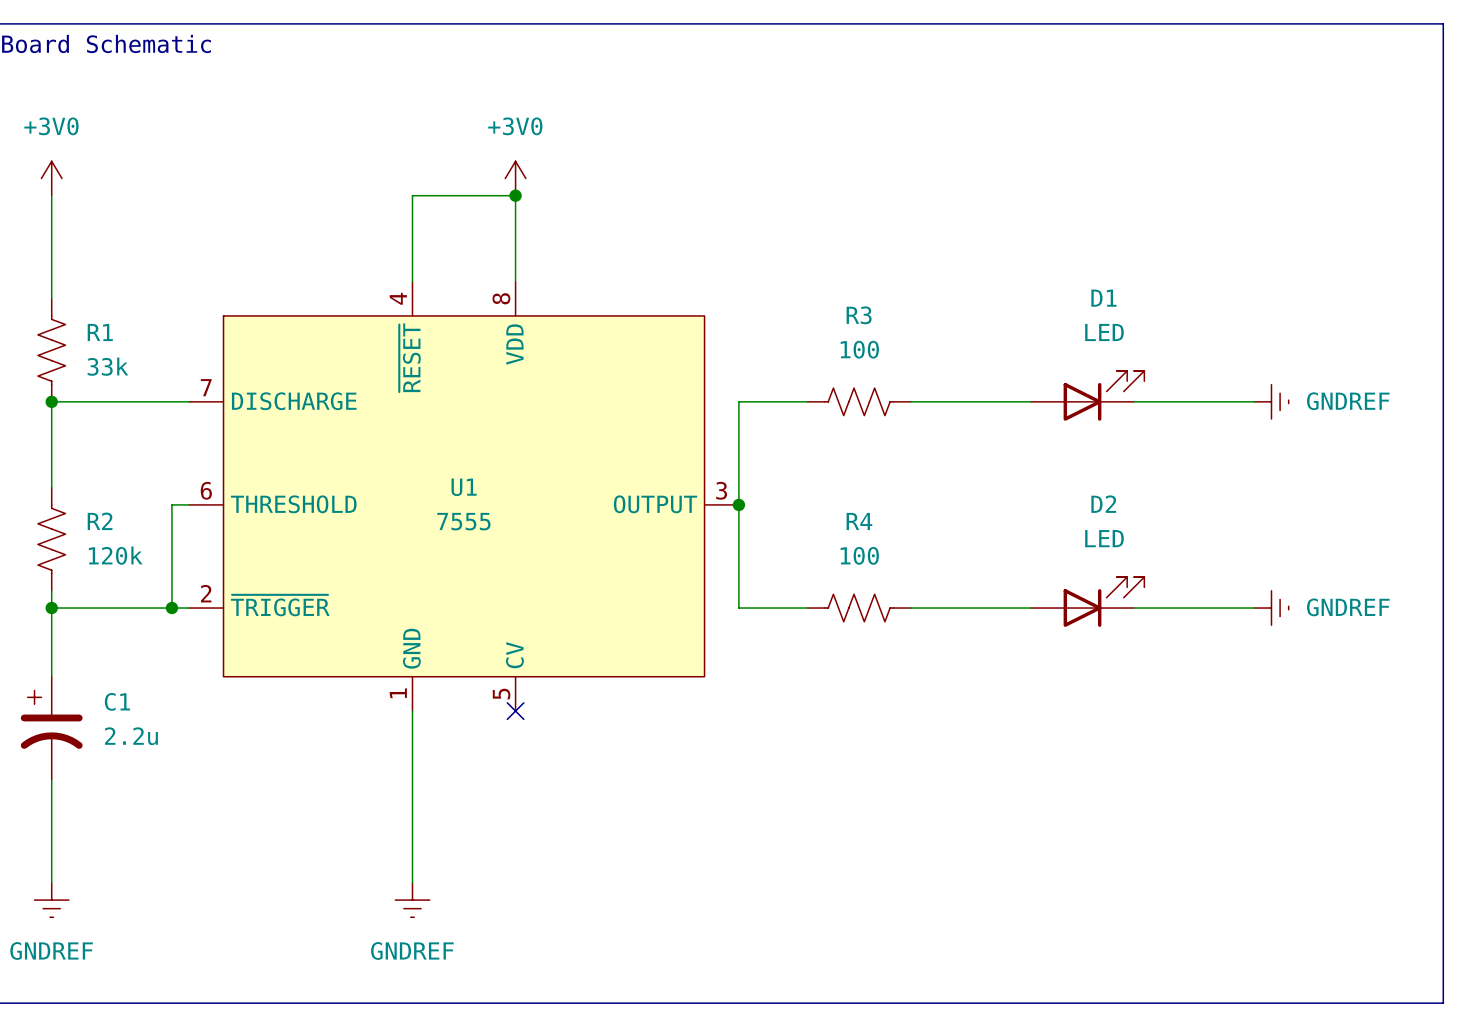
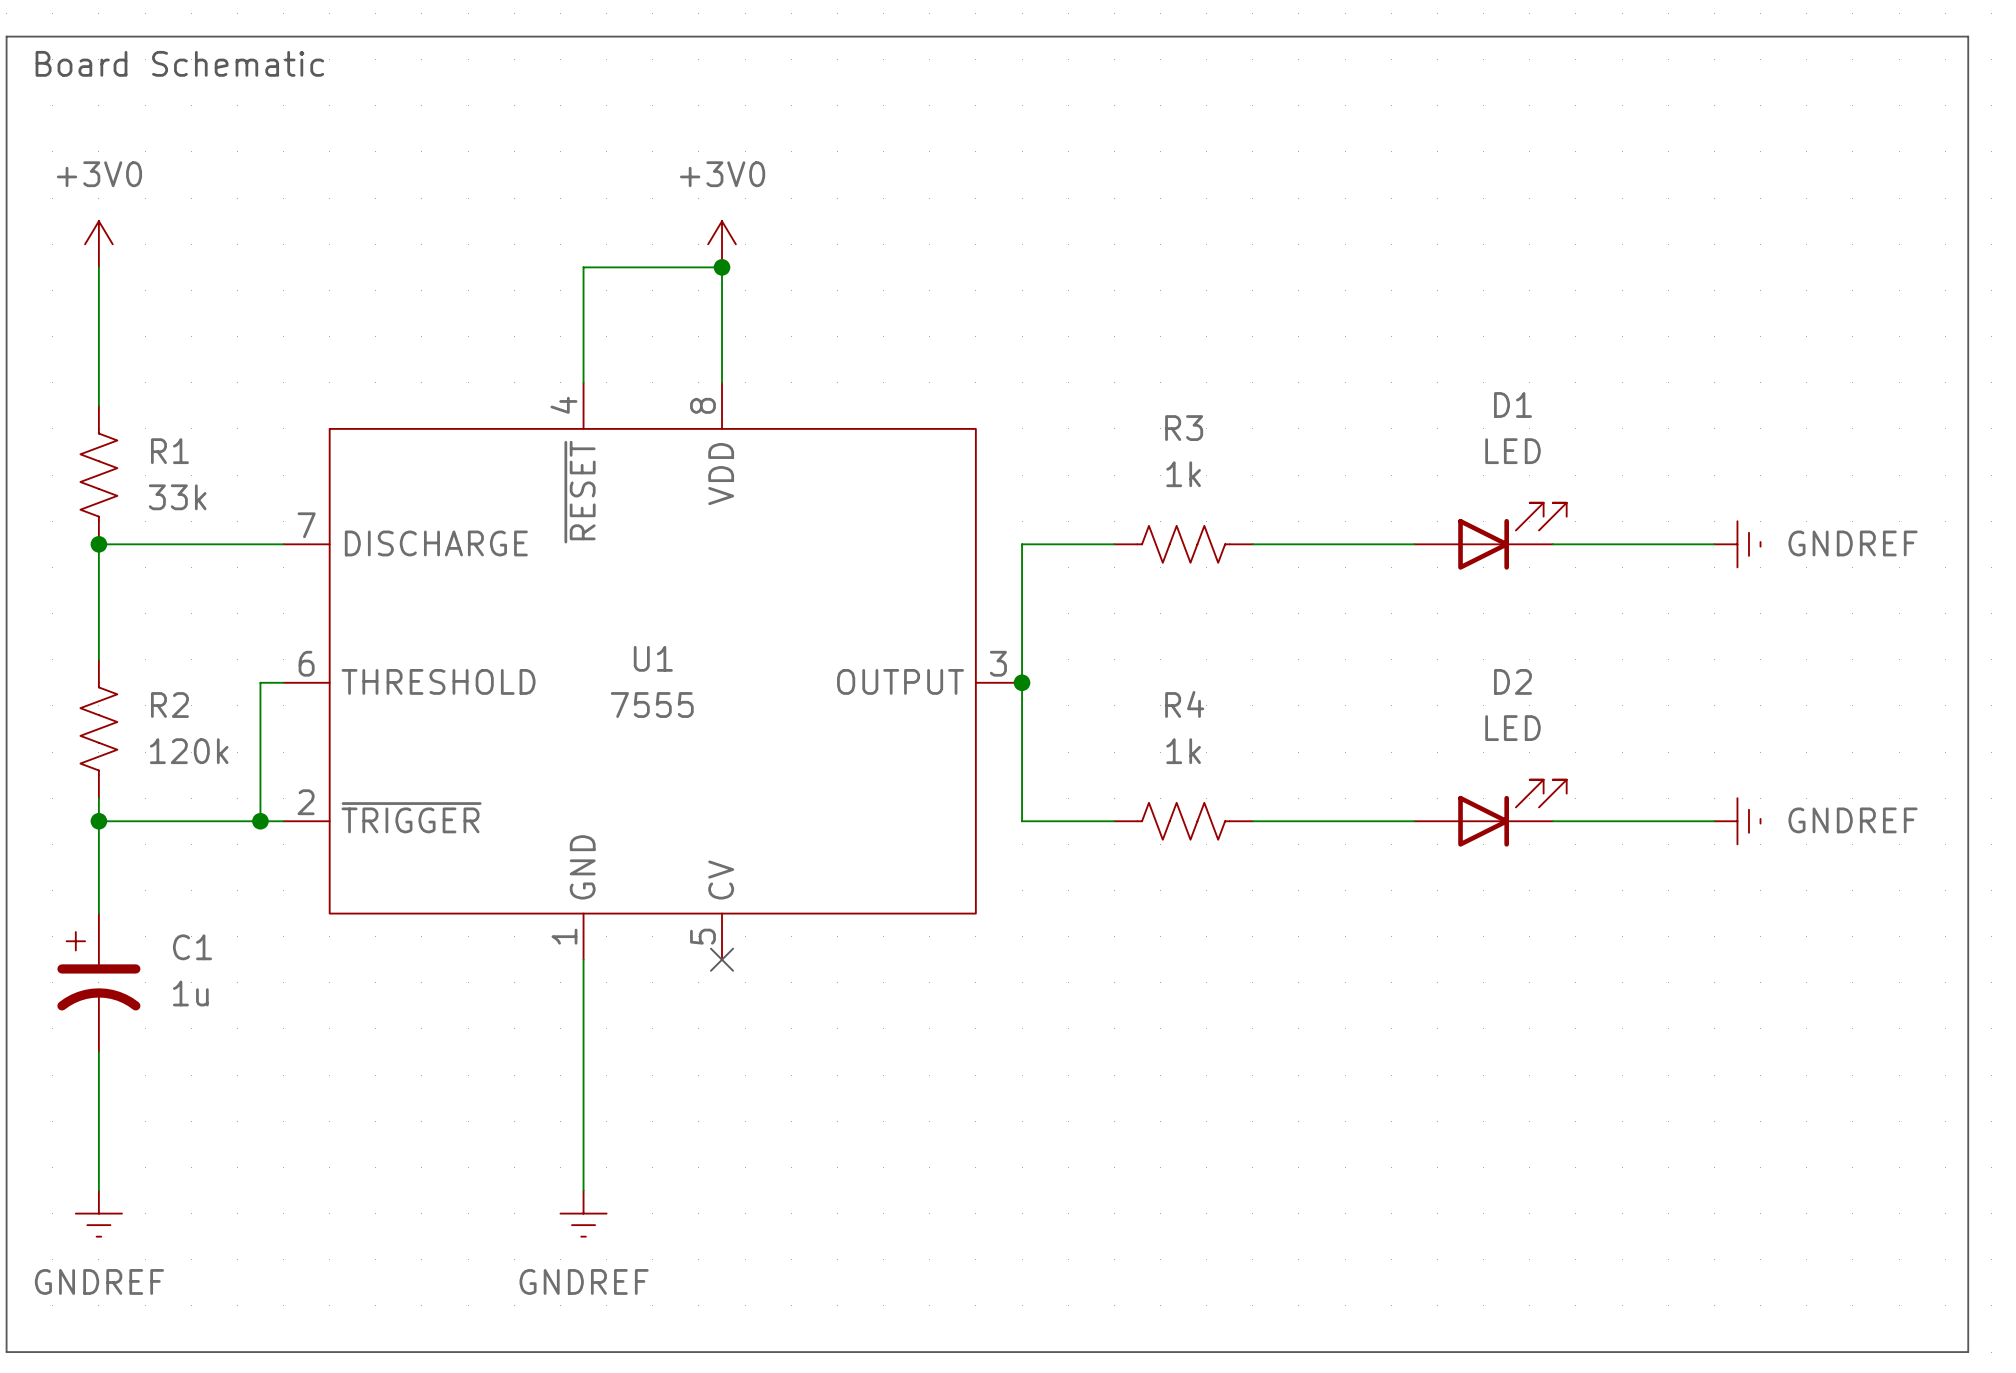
R3 value: 100 (859, 349) -> 1k (1183, 474)
R4 value: 100 (859, 555) -> 1k (1183, 751)
C1 value: 2.2u (131, 736) -> 1u (190, 993)

